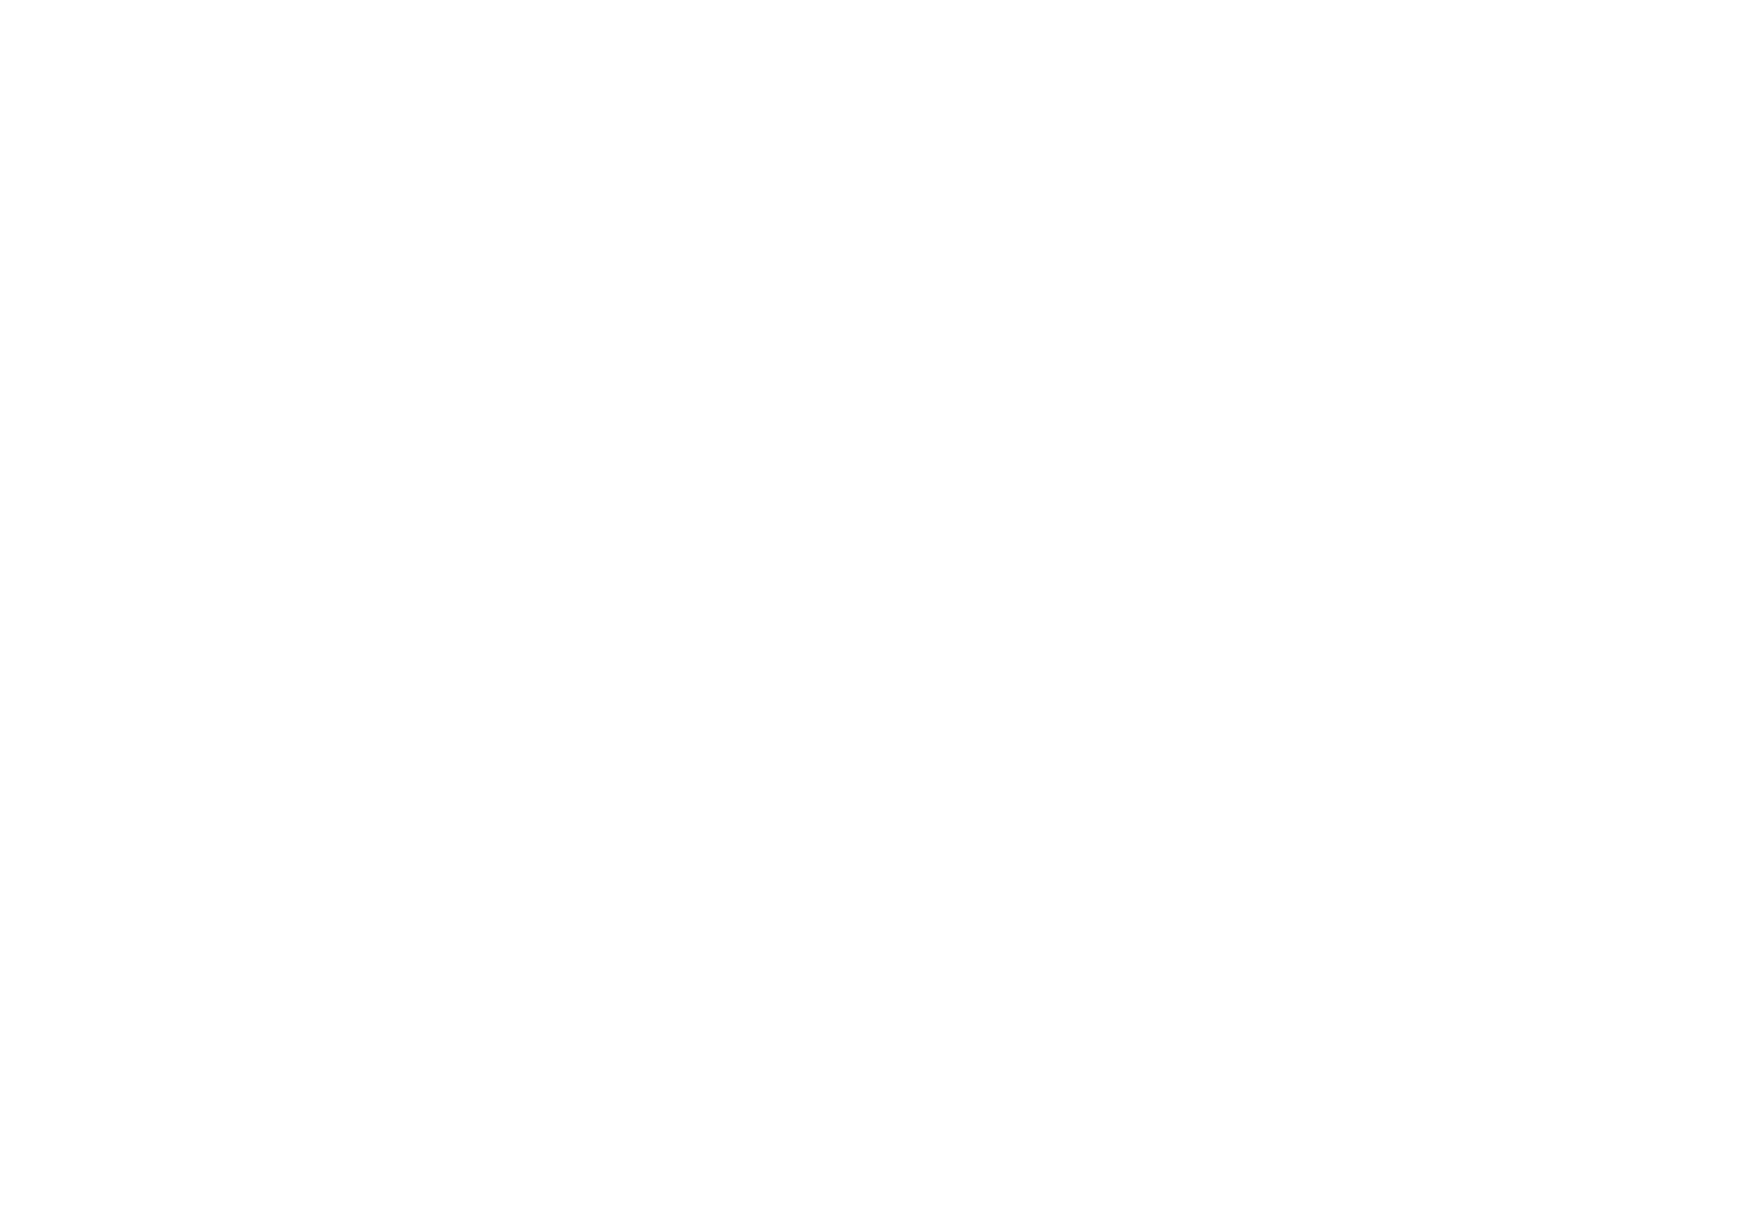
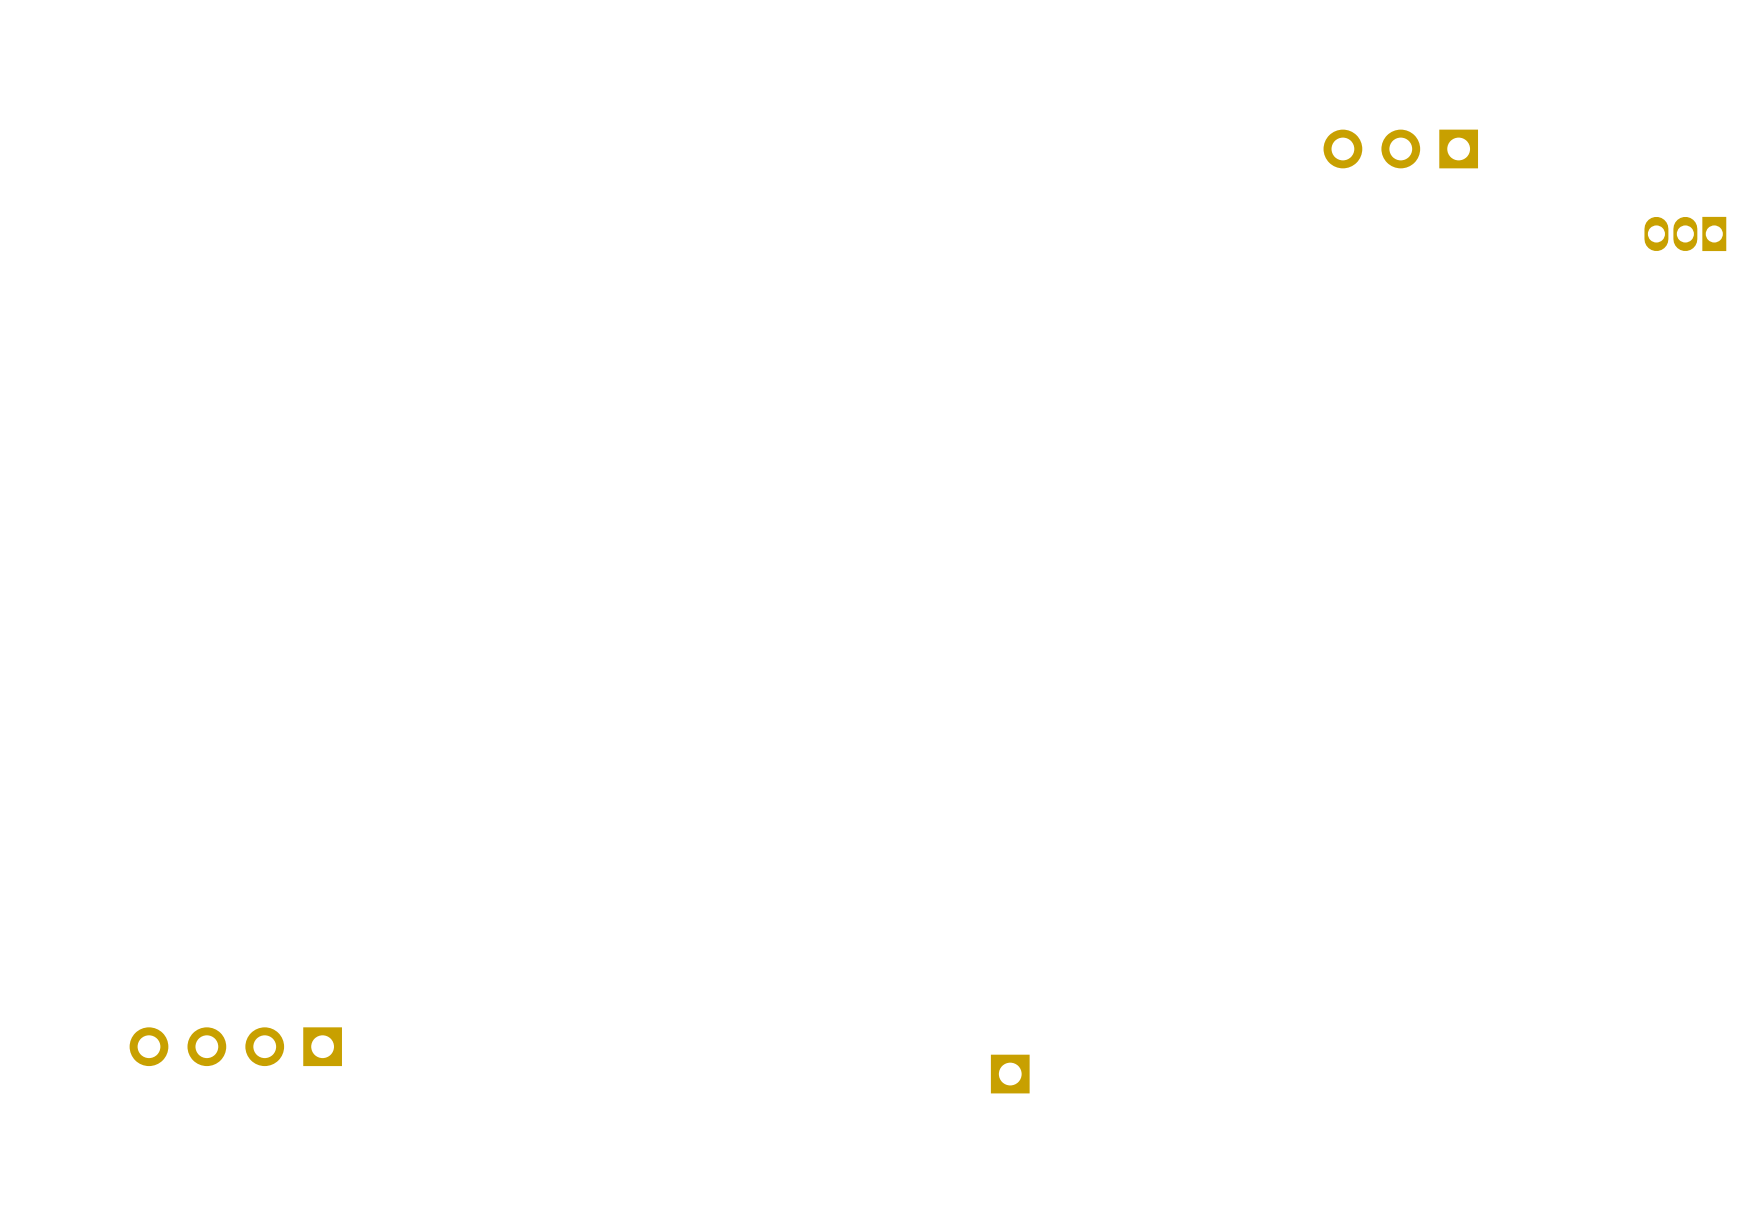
part: none -> (1400, 148)
part: none -> (1685, 233)
part: none -> (235, 1046)
part: none -> (1010, 1074)

